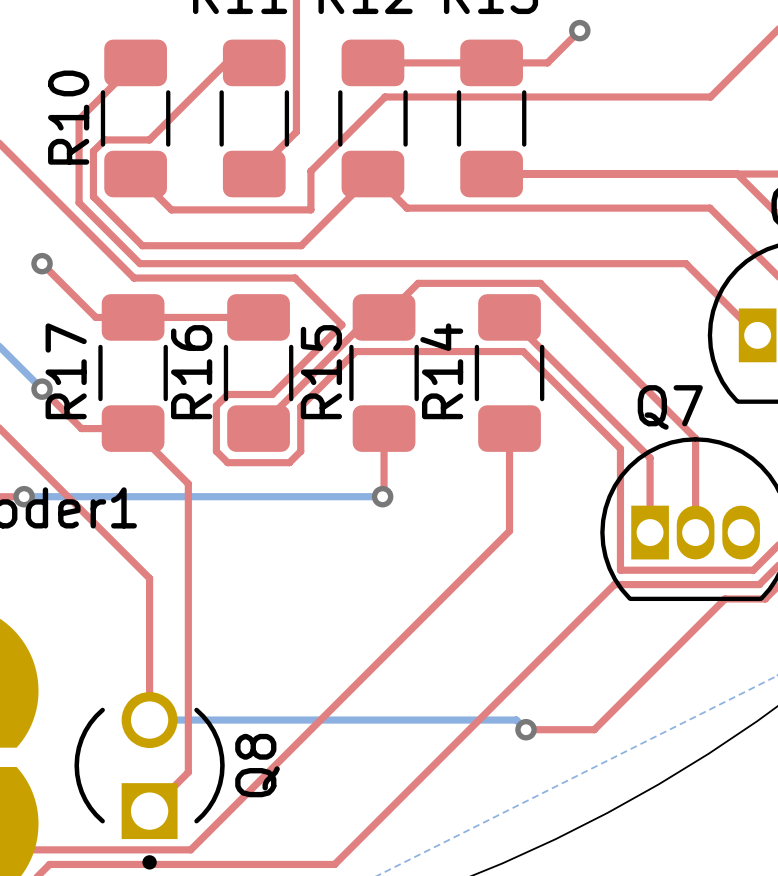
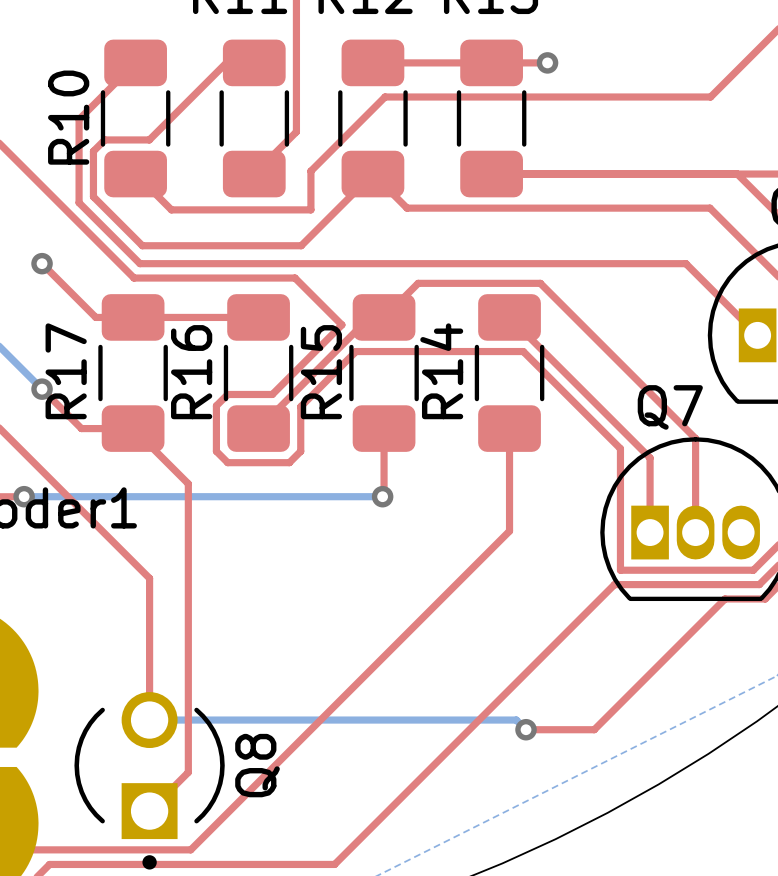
top track: (579, 30) (547, 62) -> none
via position: (579, 30) -> (547, 62)

